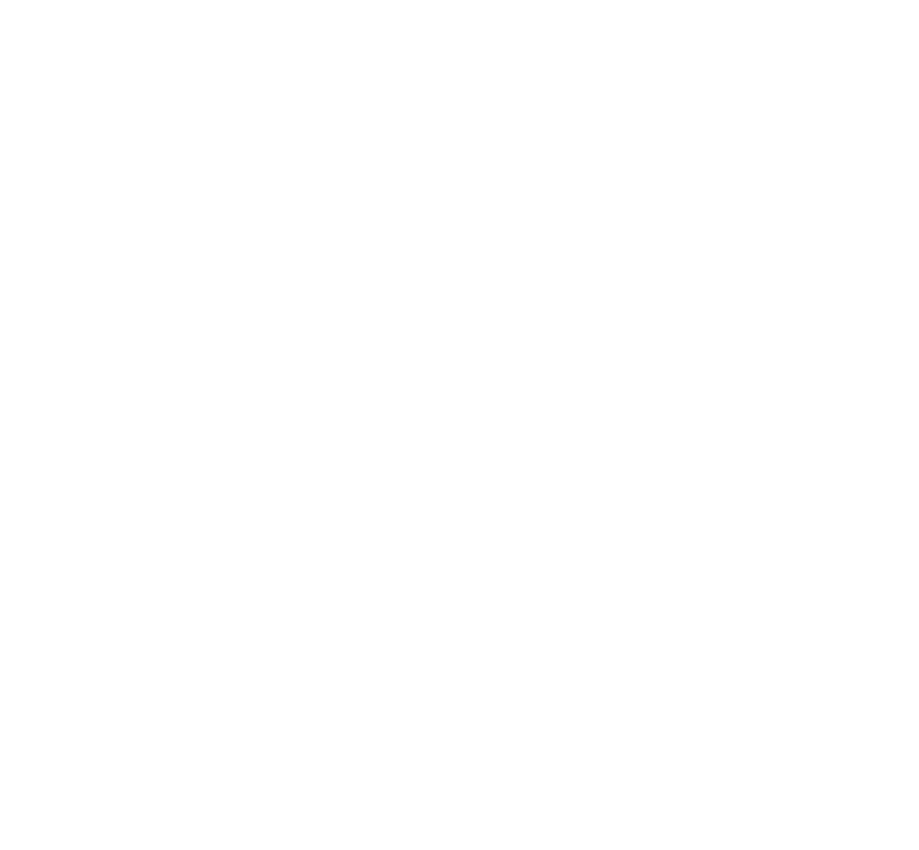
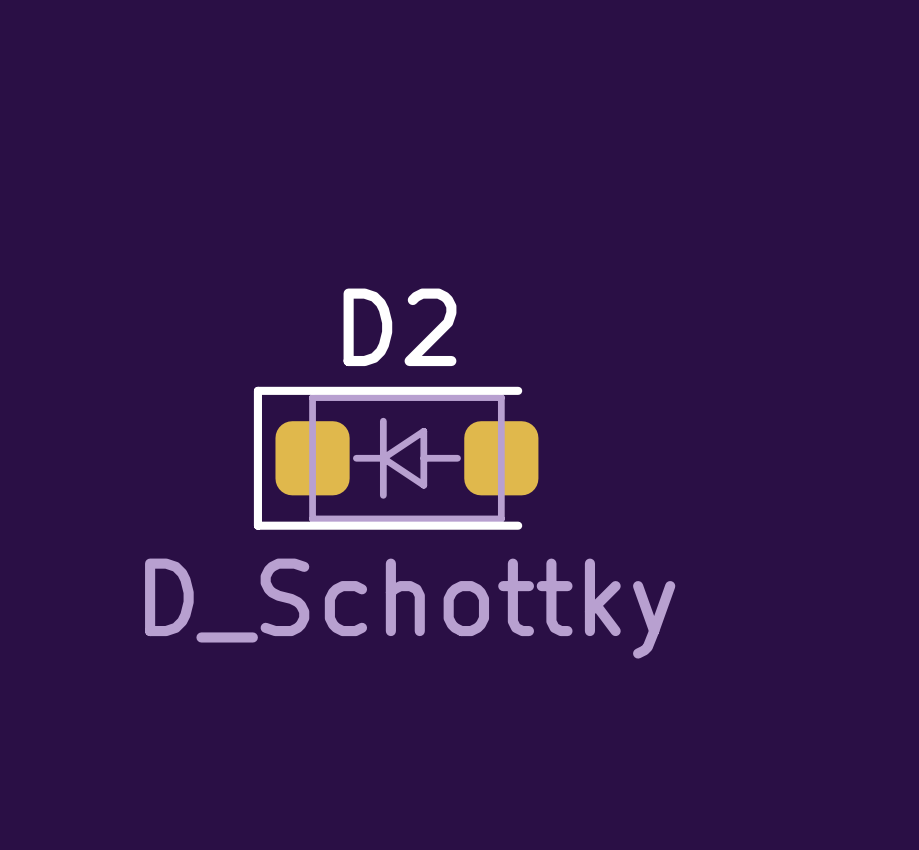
D2: none -> D_Schottky (396, 458)

